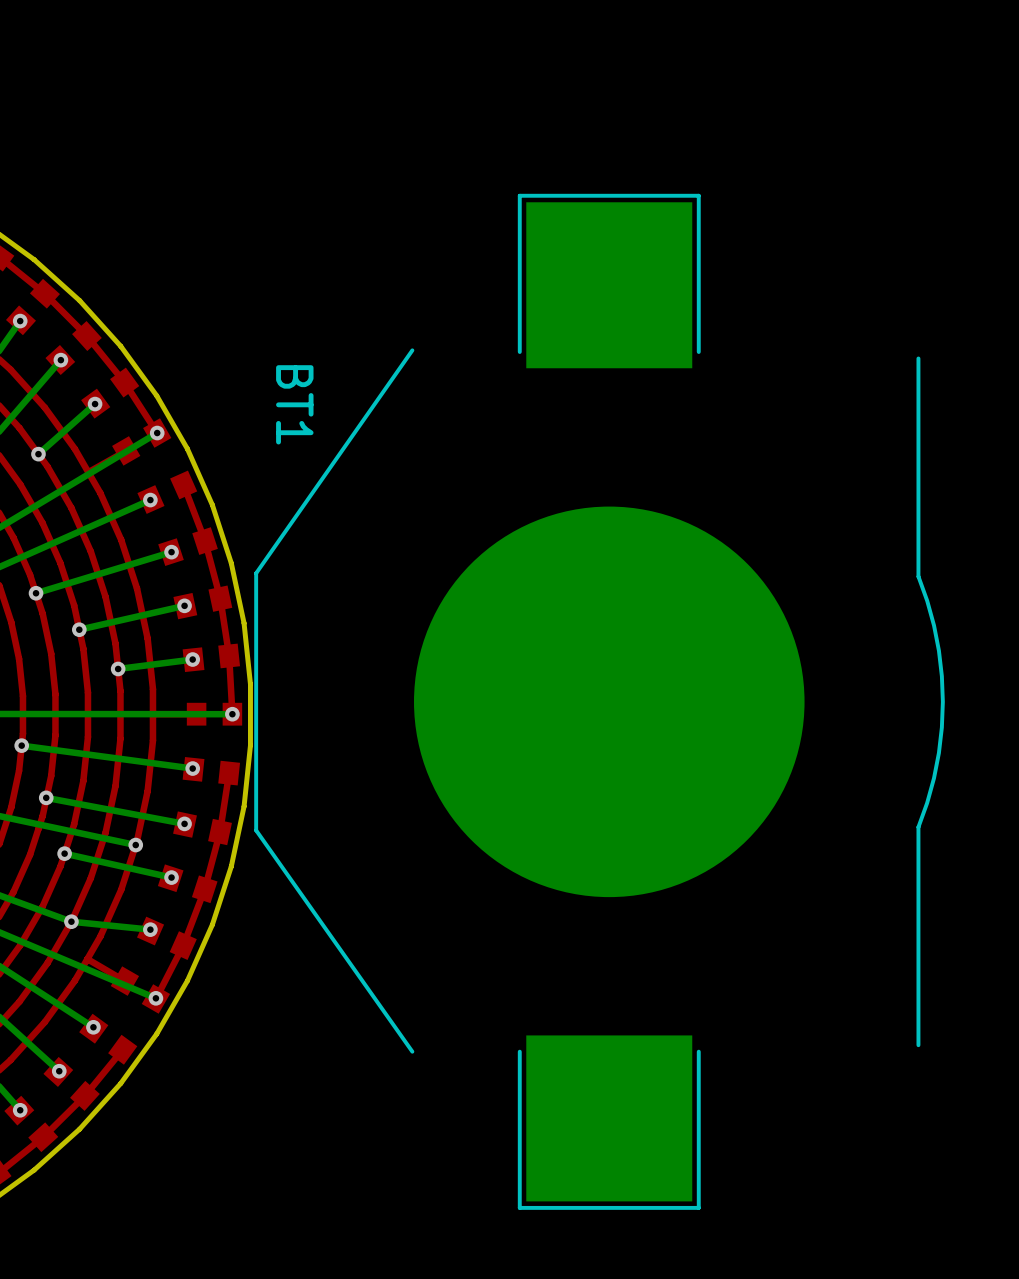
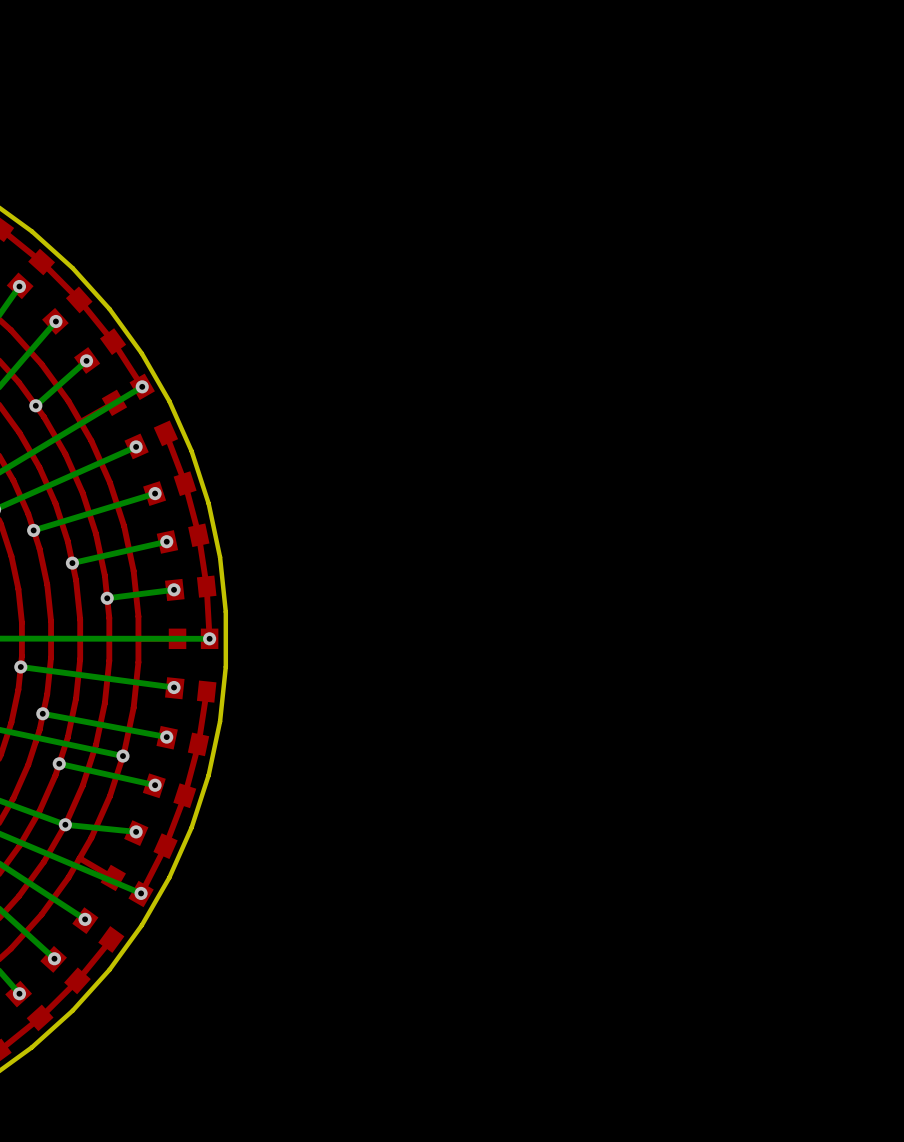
BT1: (599, 701) -> none

